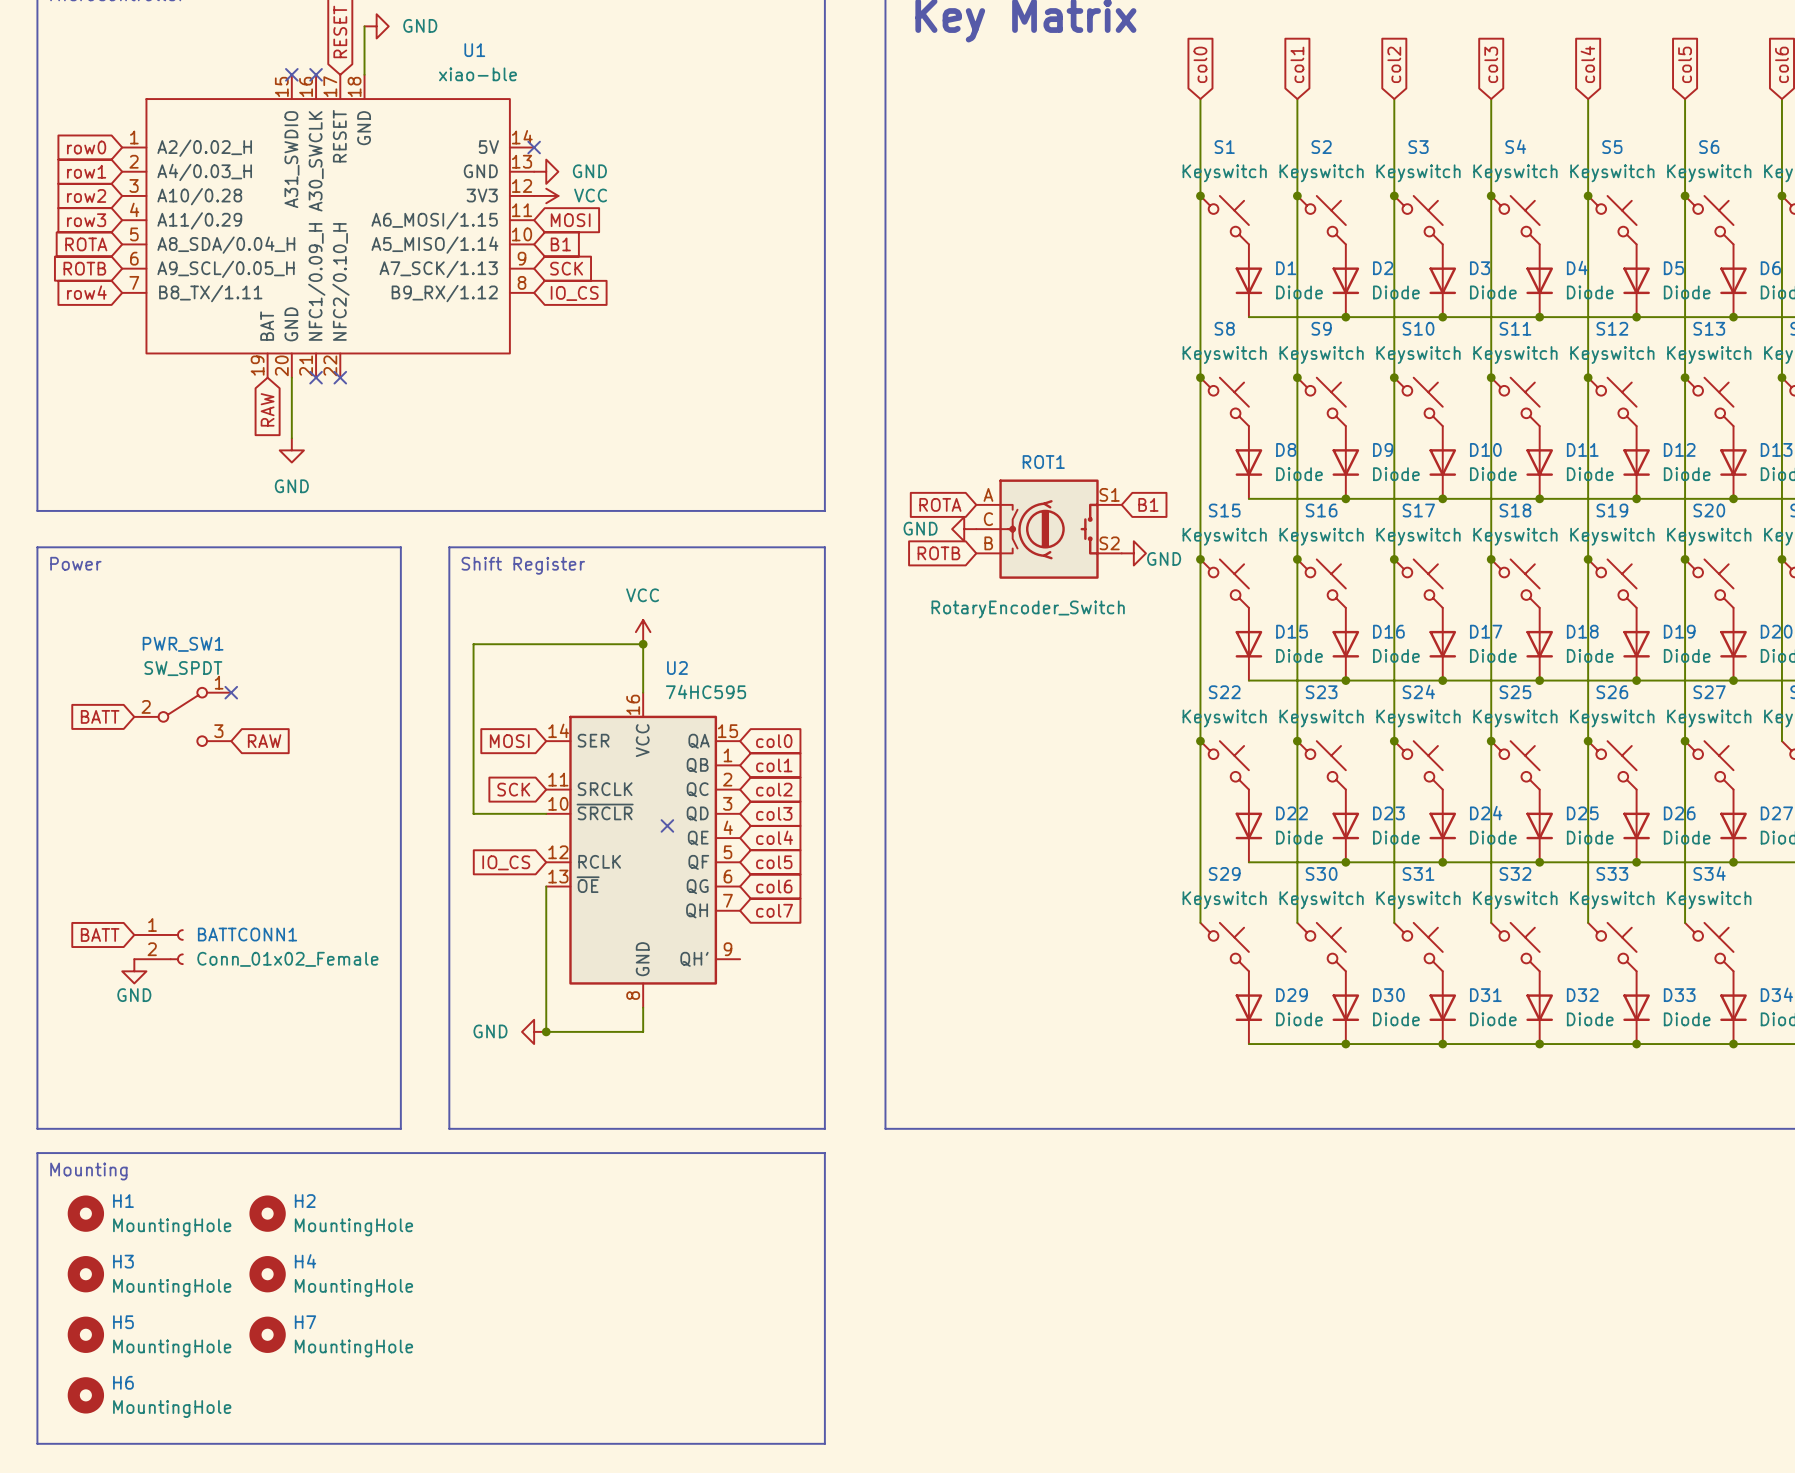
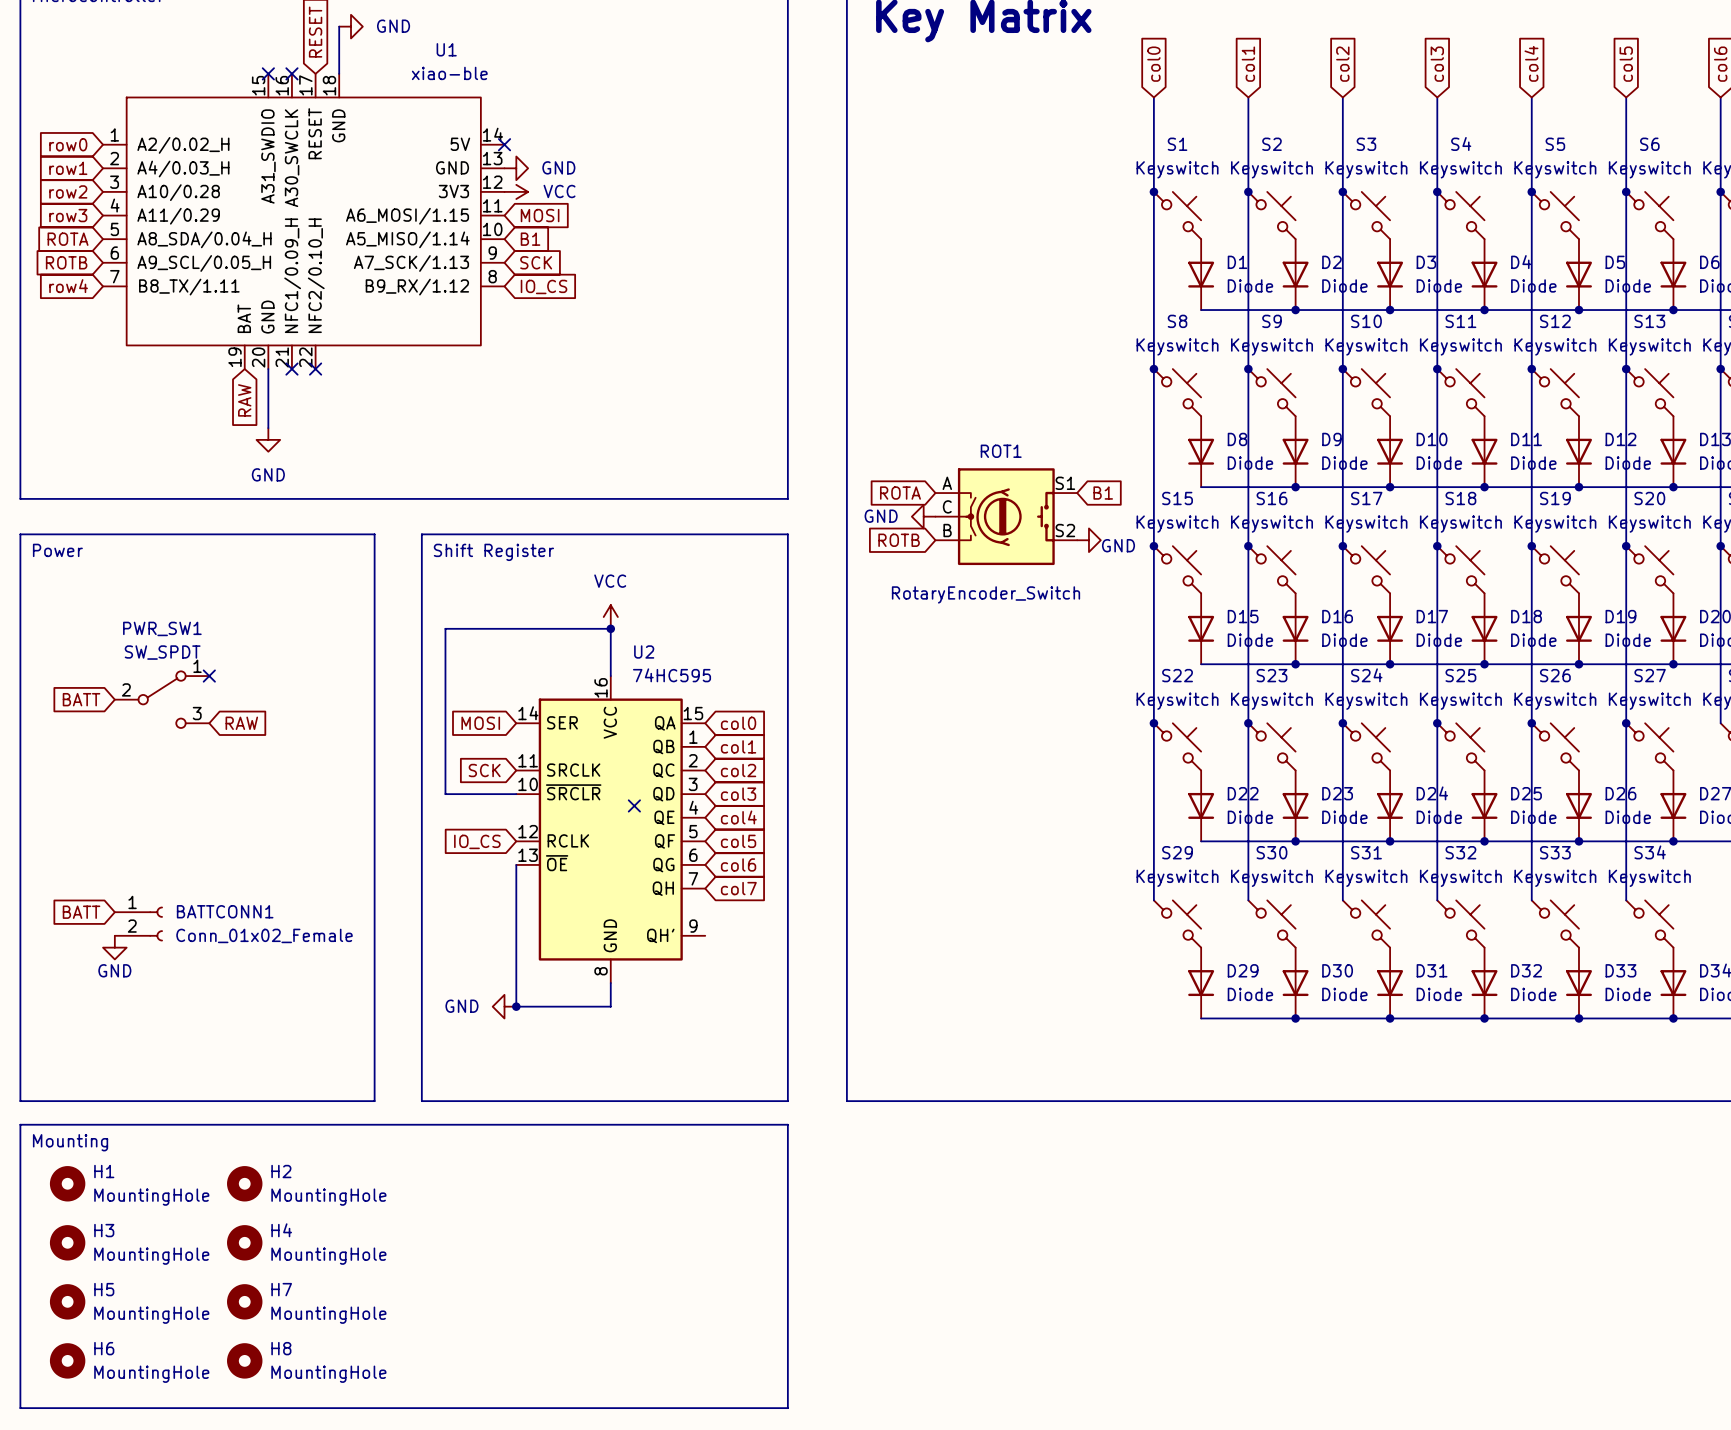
H8: none -> MountingHole (244, 1360)

